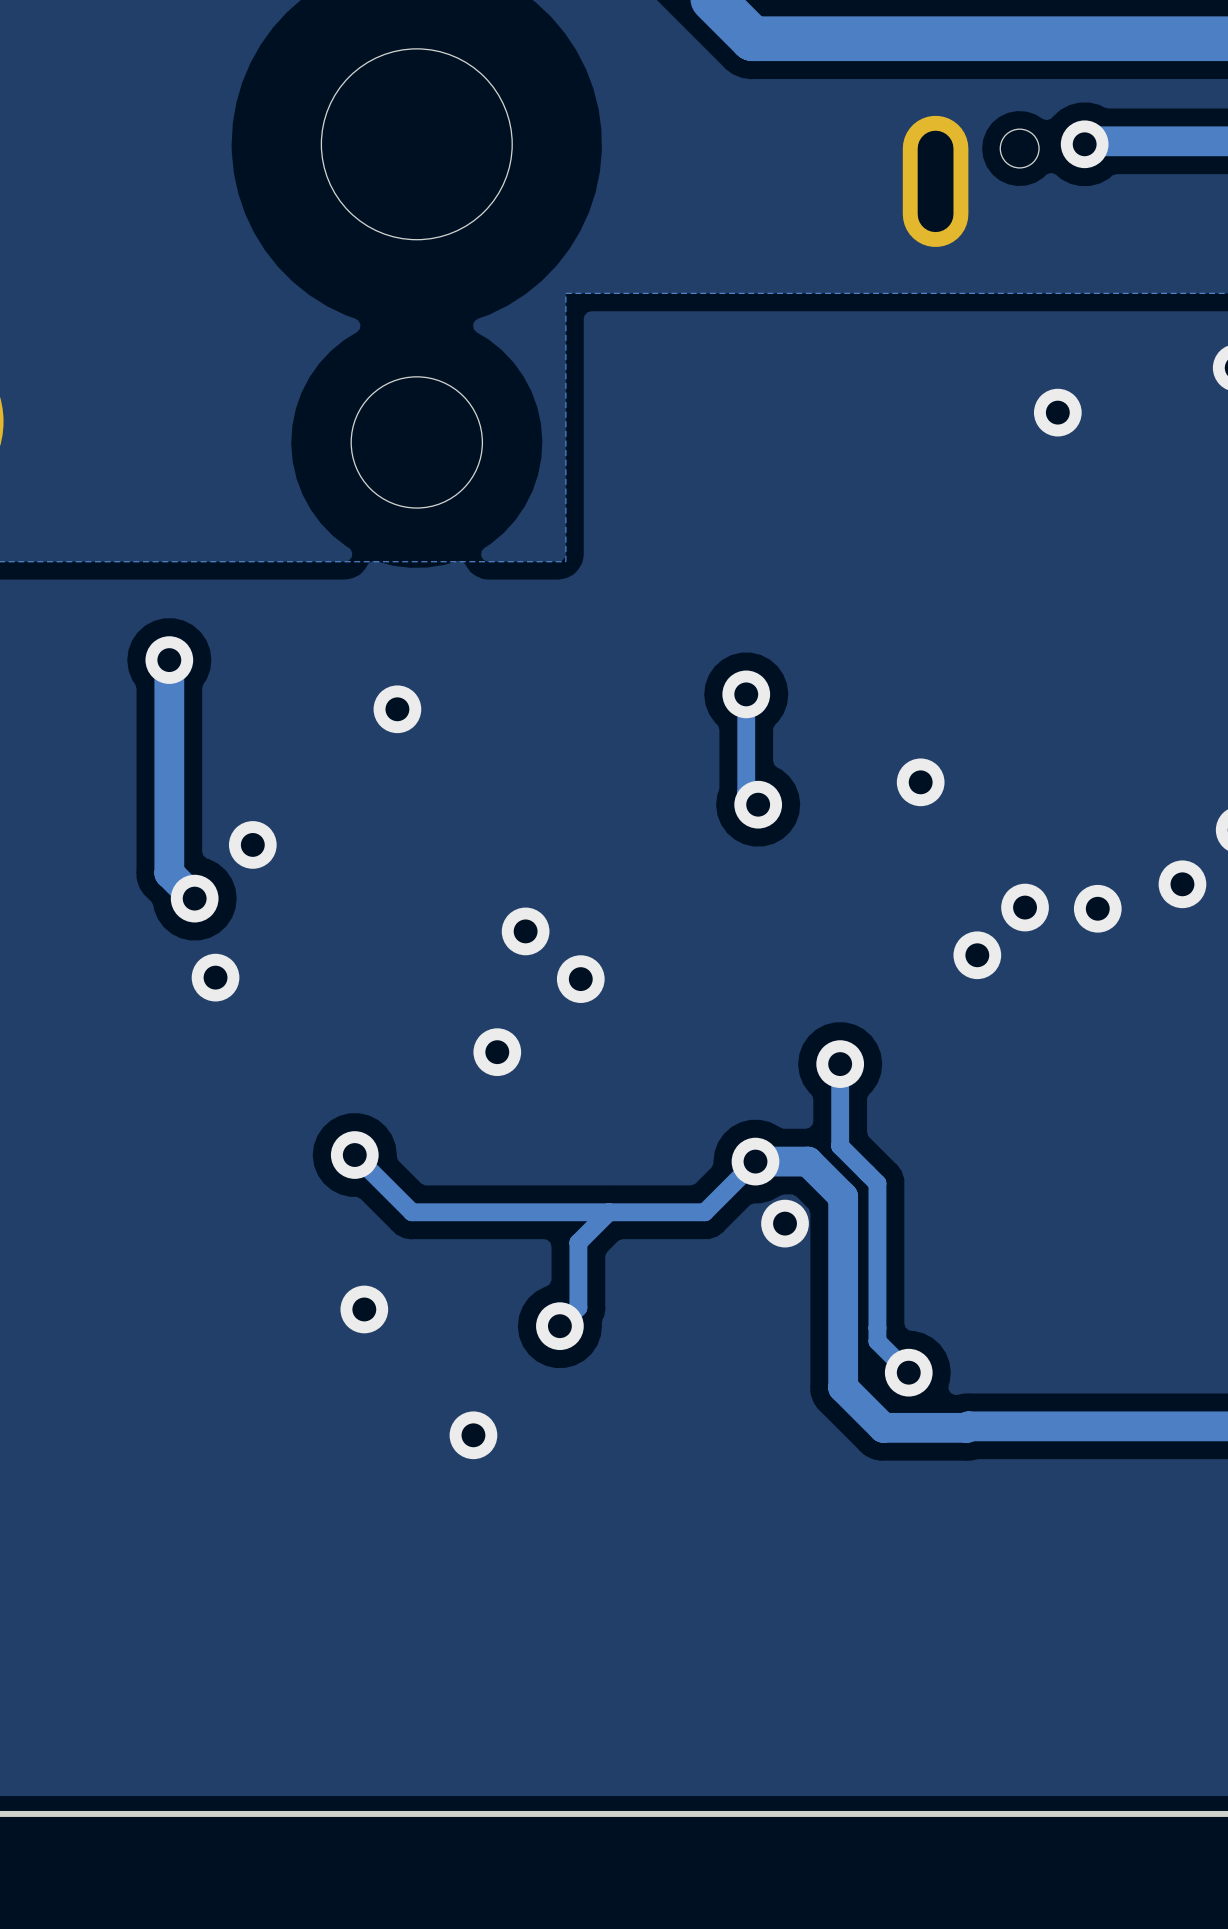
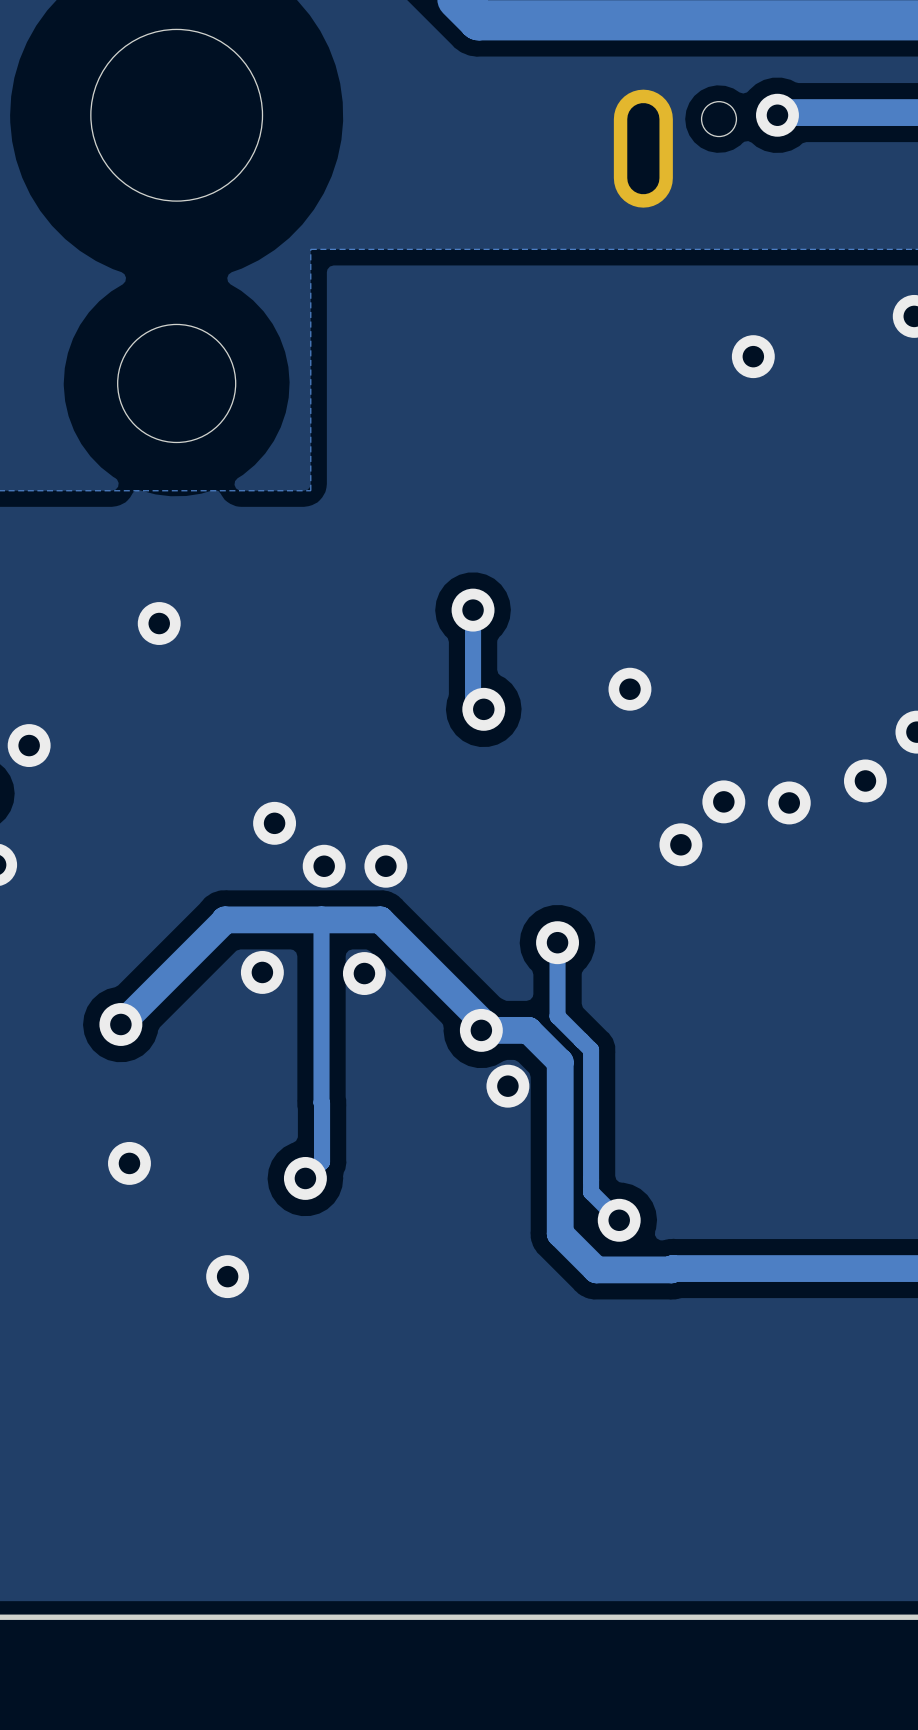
via: none -> (385, 866)
track: none -> (224, 920) (120, 1024)
via position: (497, 1052) -> (262, 972)
via: none -> (364, 973)
track: (354, 1155) (412, 1212) (704, 1212) (755, 1161) -> (224, 919) (380, 919) (481, 1020) (481, 1030)
track: (608, 1212) (578, 1242) -> (321, 919) (321, 1102)

